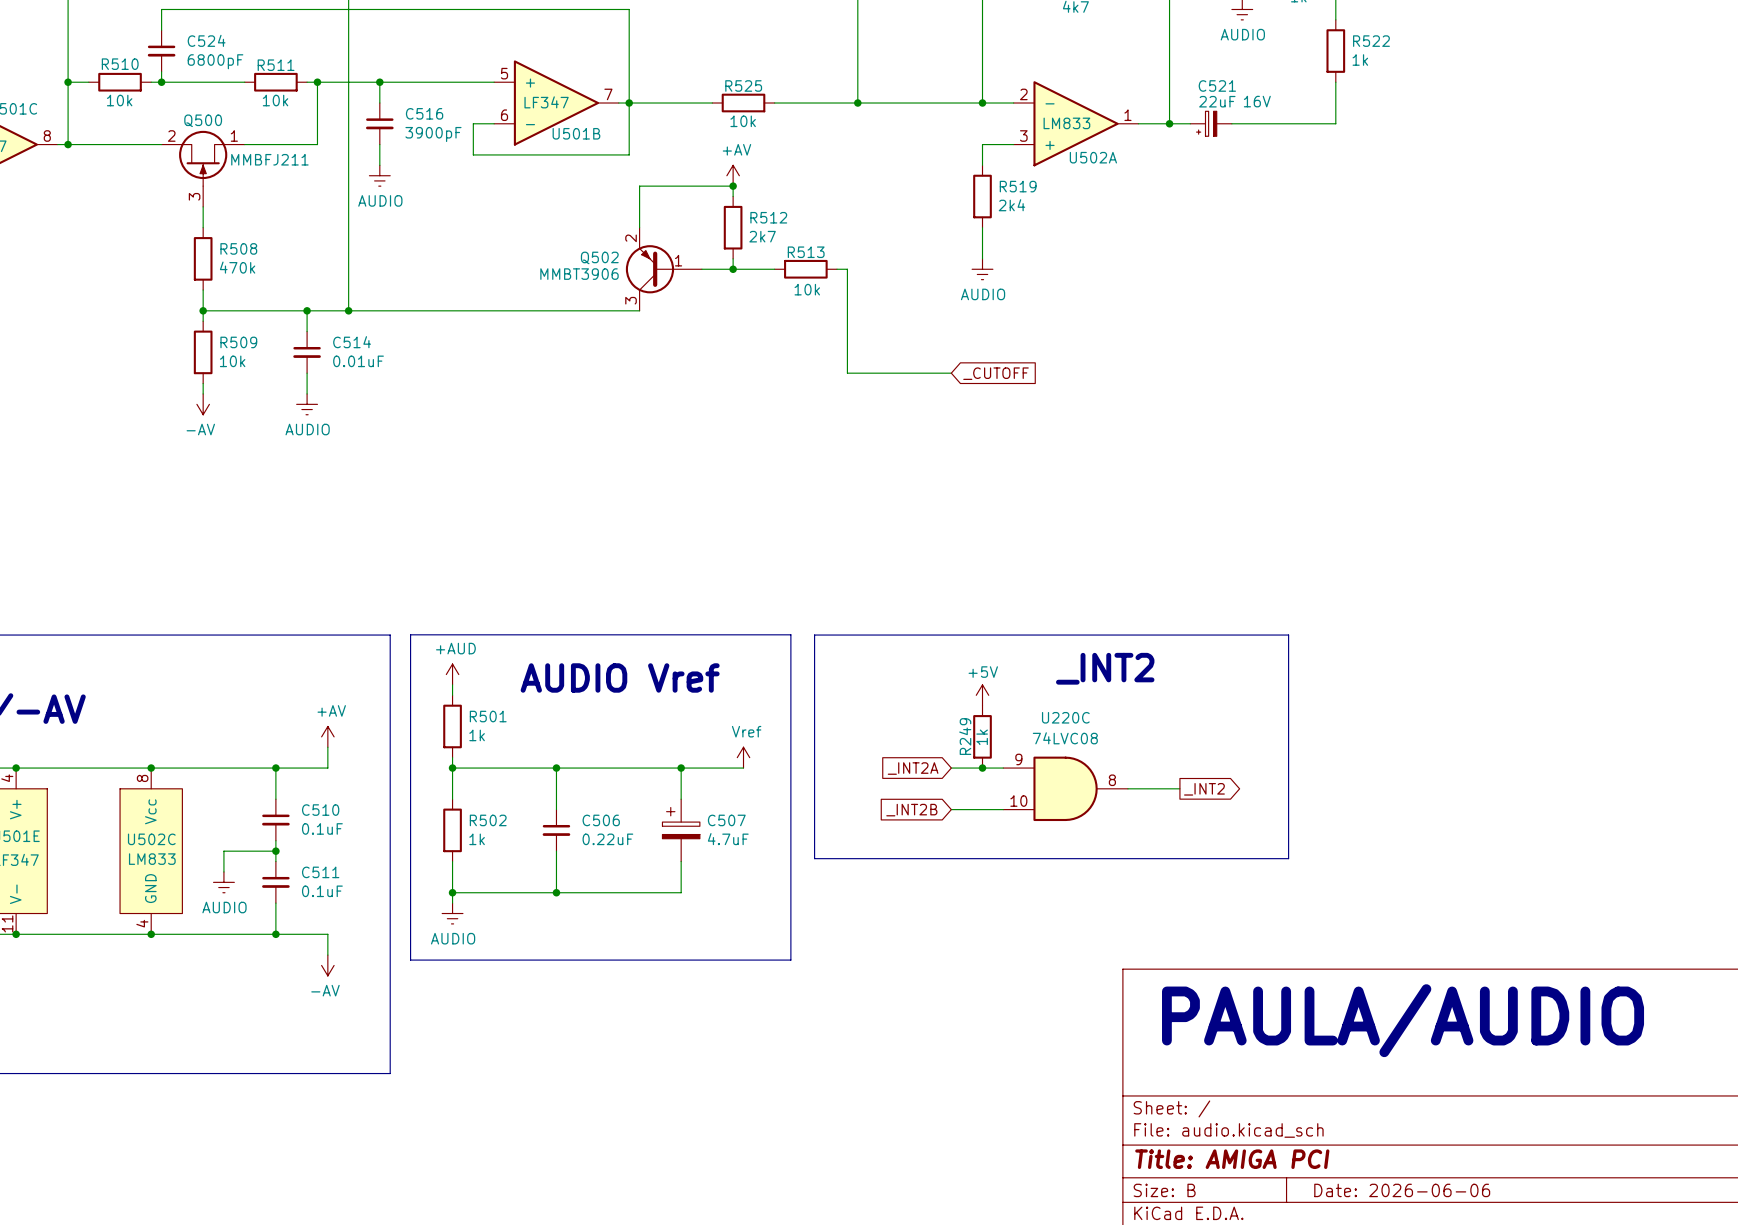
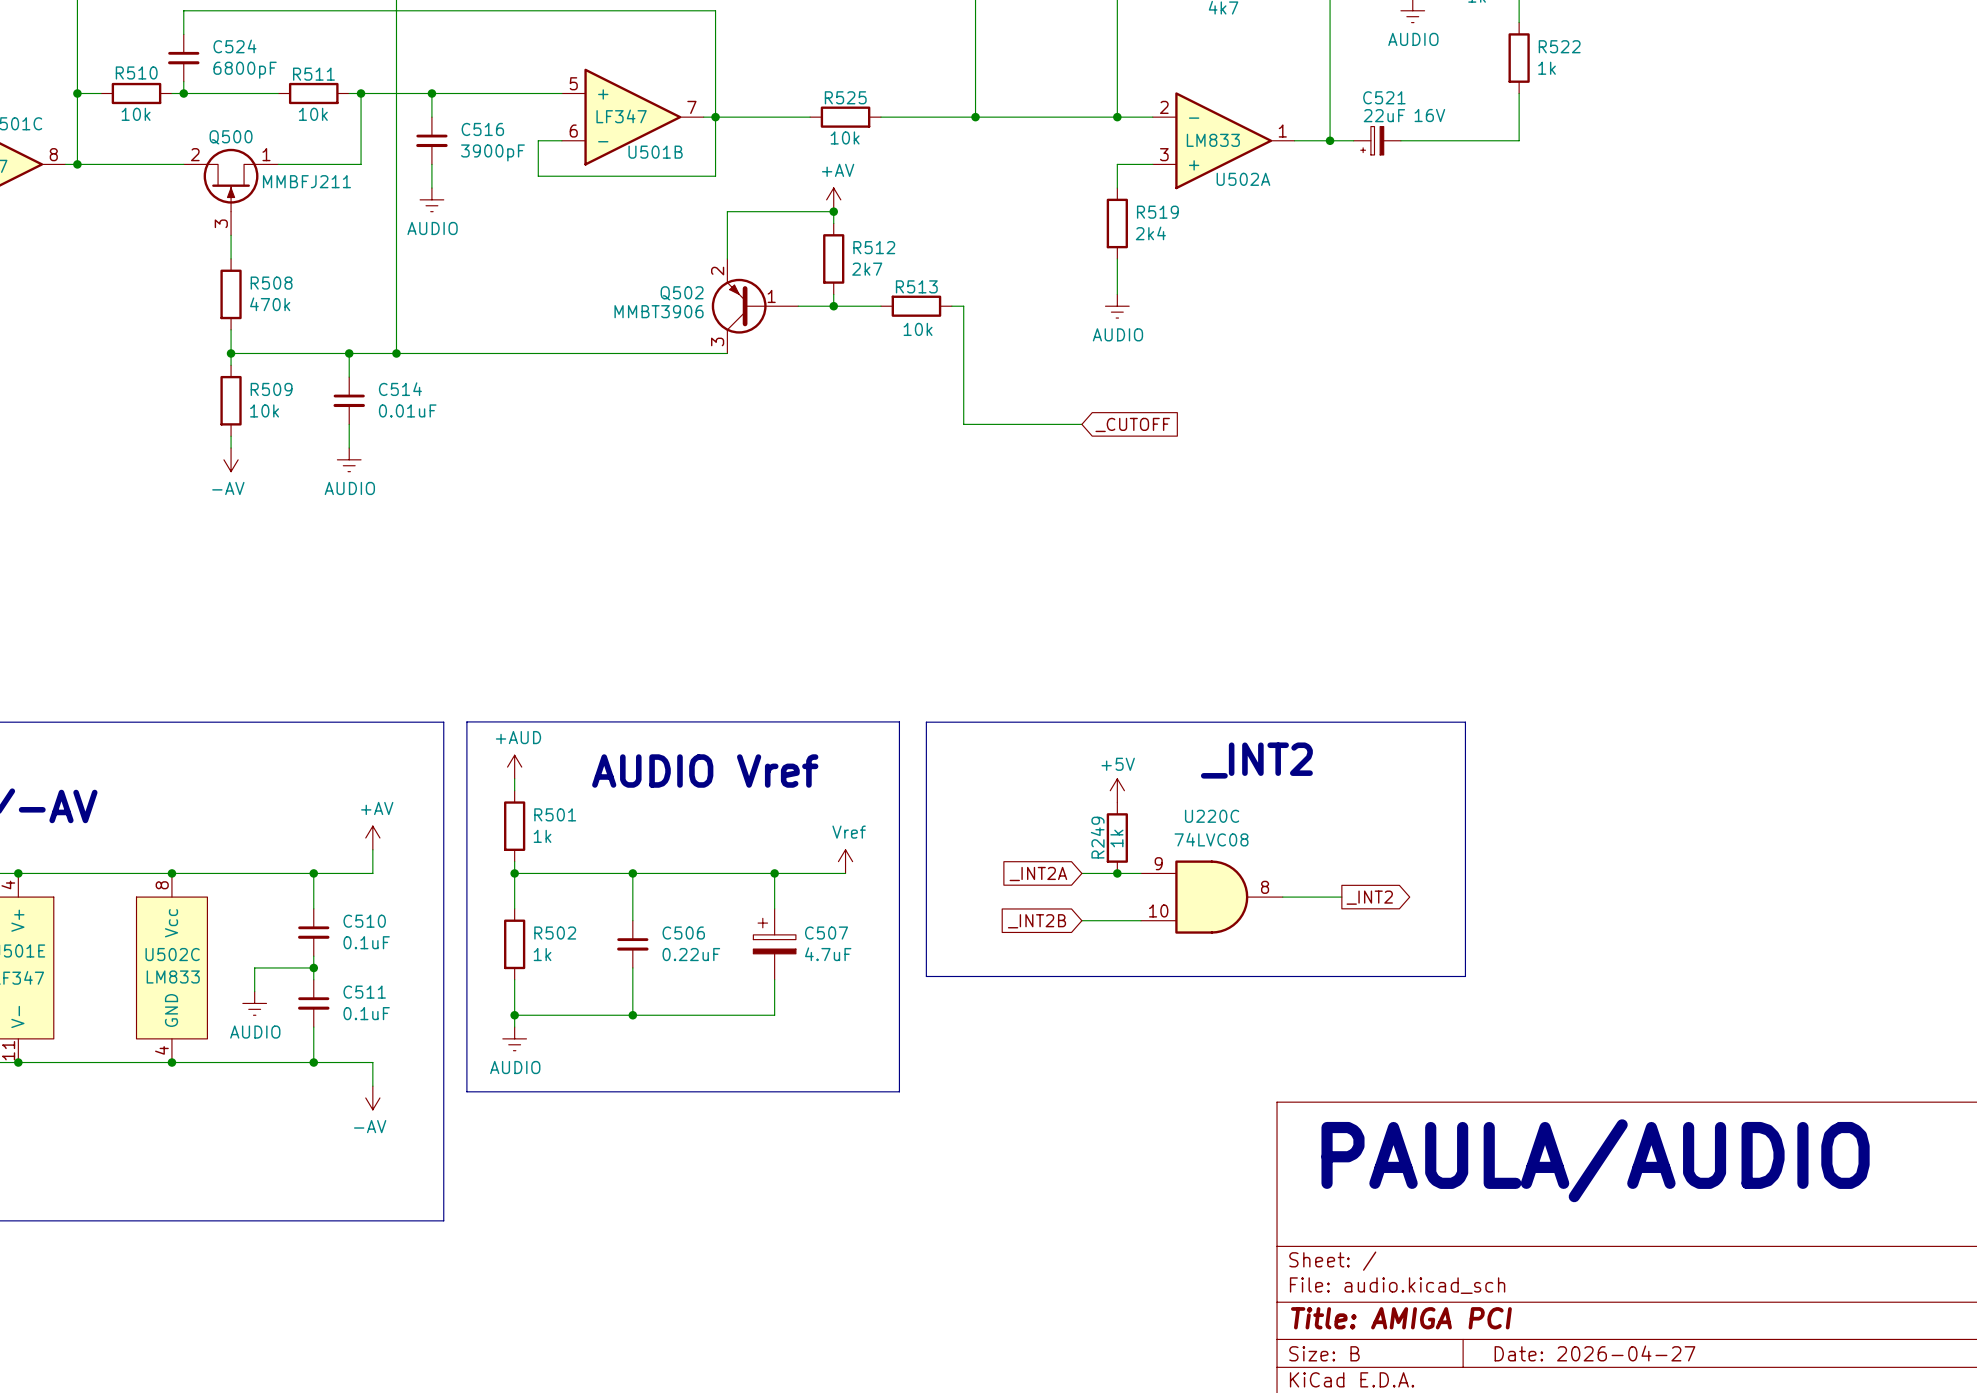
title block: Date: 2026-06-06 (1402, 1190) -> Date: 2026-04-27 (1594, 1353)

